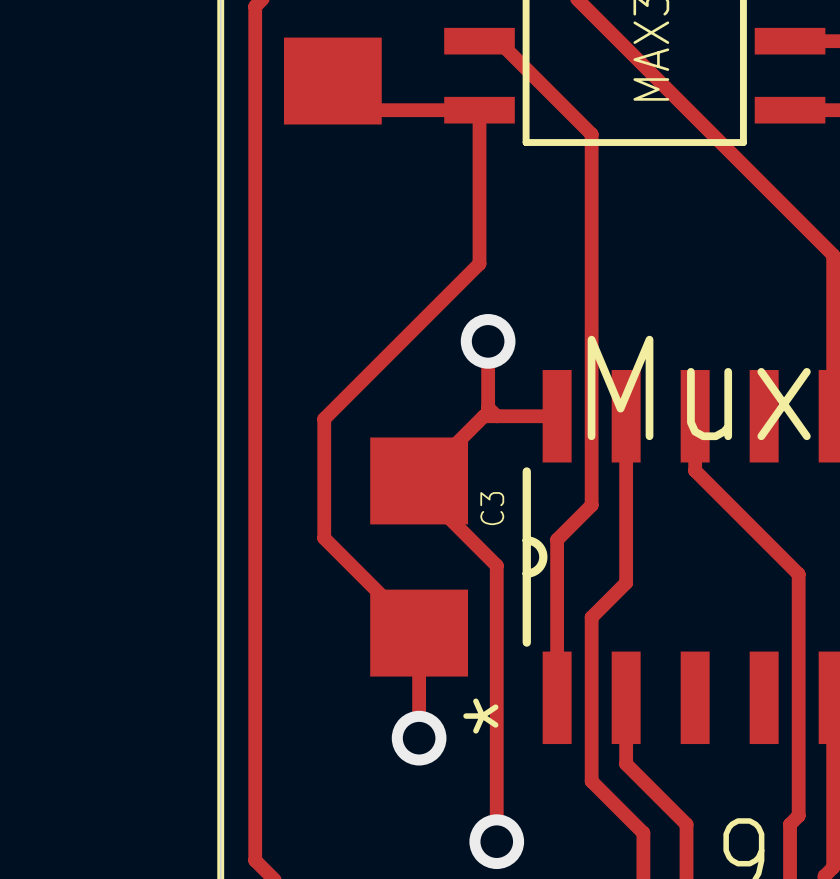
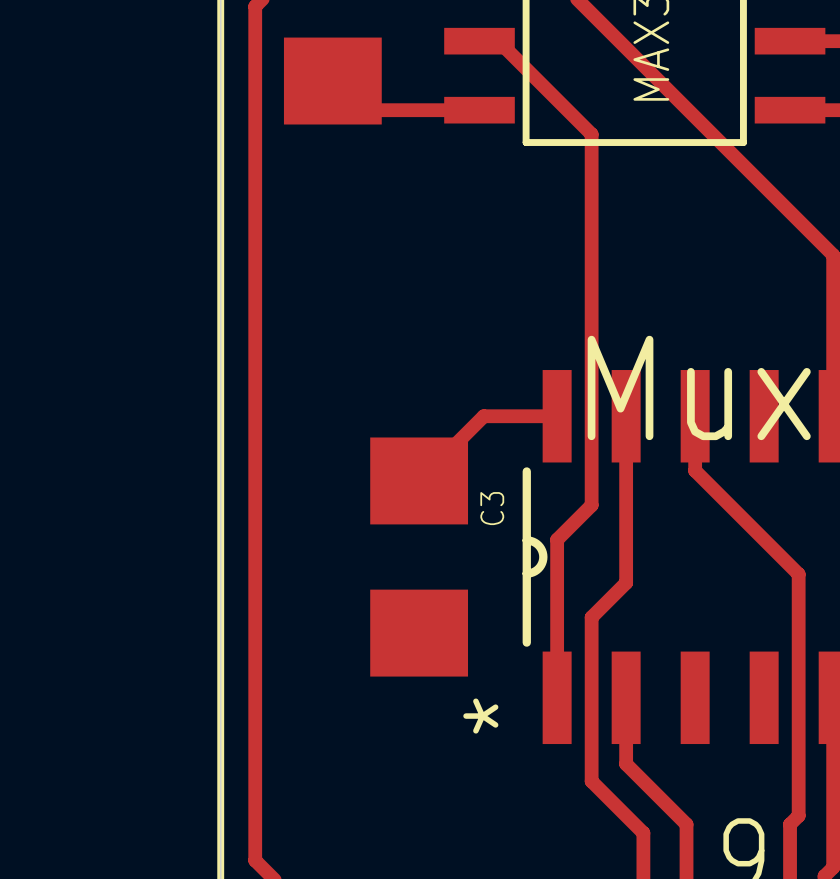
track: (479, 110) (479, 263) (324, 419) (324, 538) (419, 633) (419, 738) -> none
track: (488, 341) (488, 407) (496, 416) -> none
via: (488, 341) -> none
track: (419, 480) (419, 488) (496, 565) (496, 841) -> none
via: (419, 738) -> none
via: (496, 841) -> none

